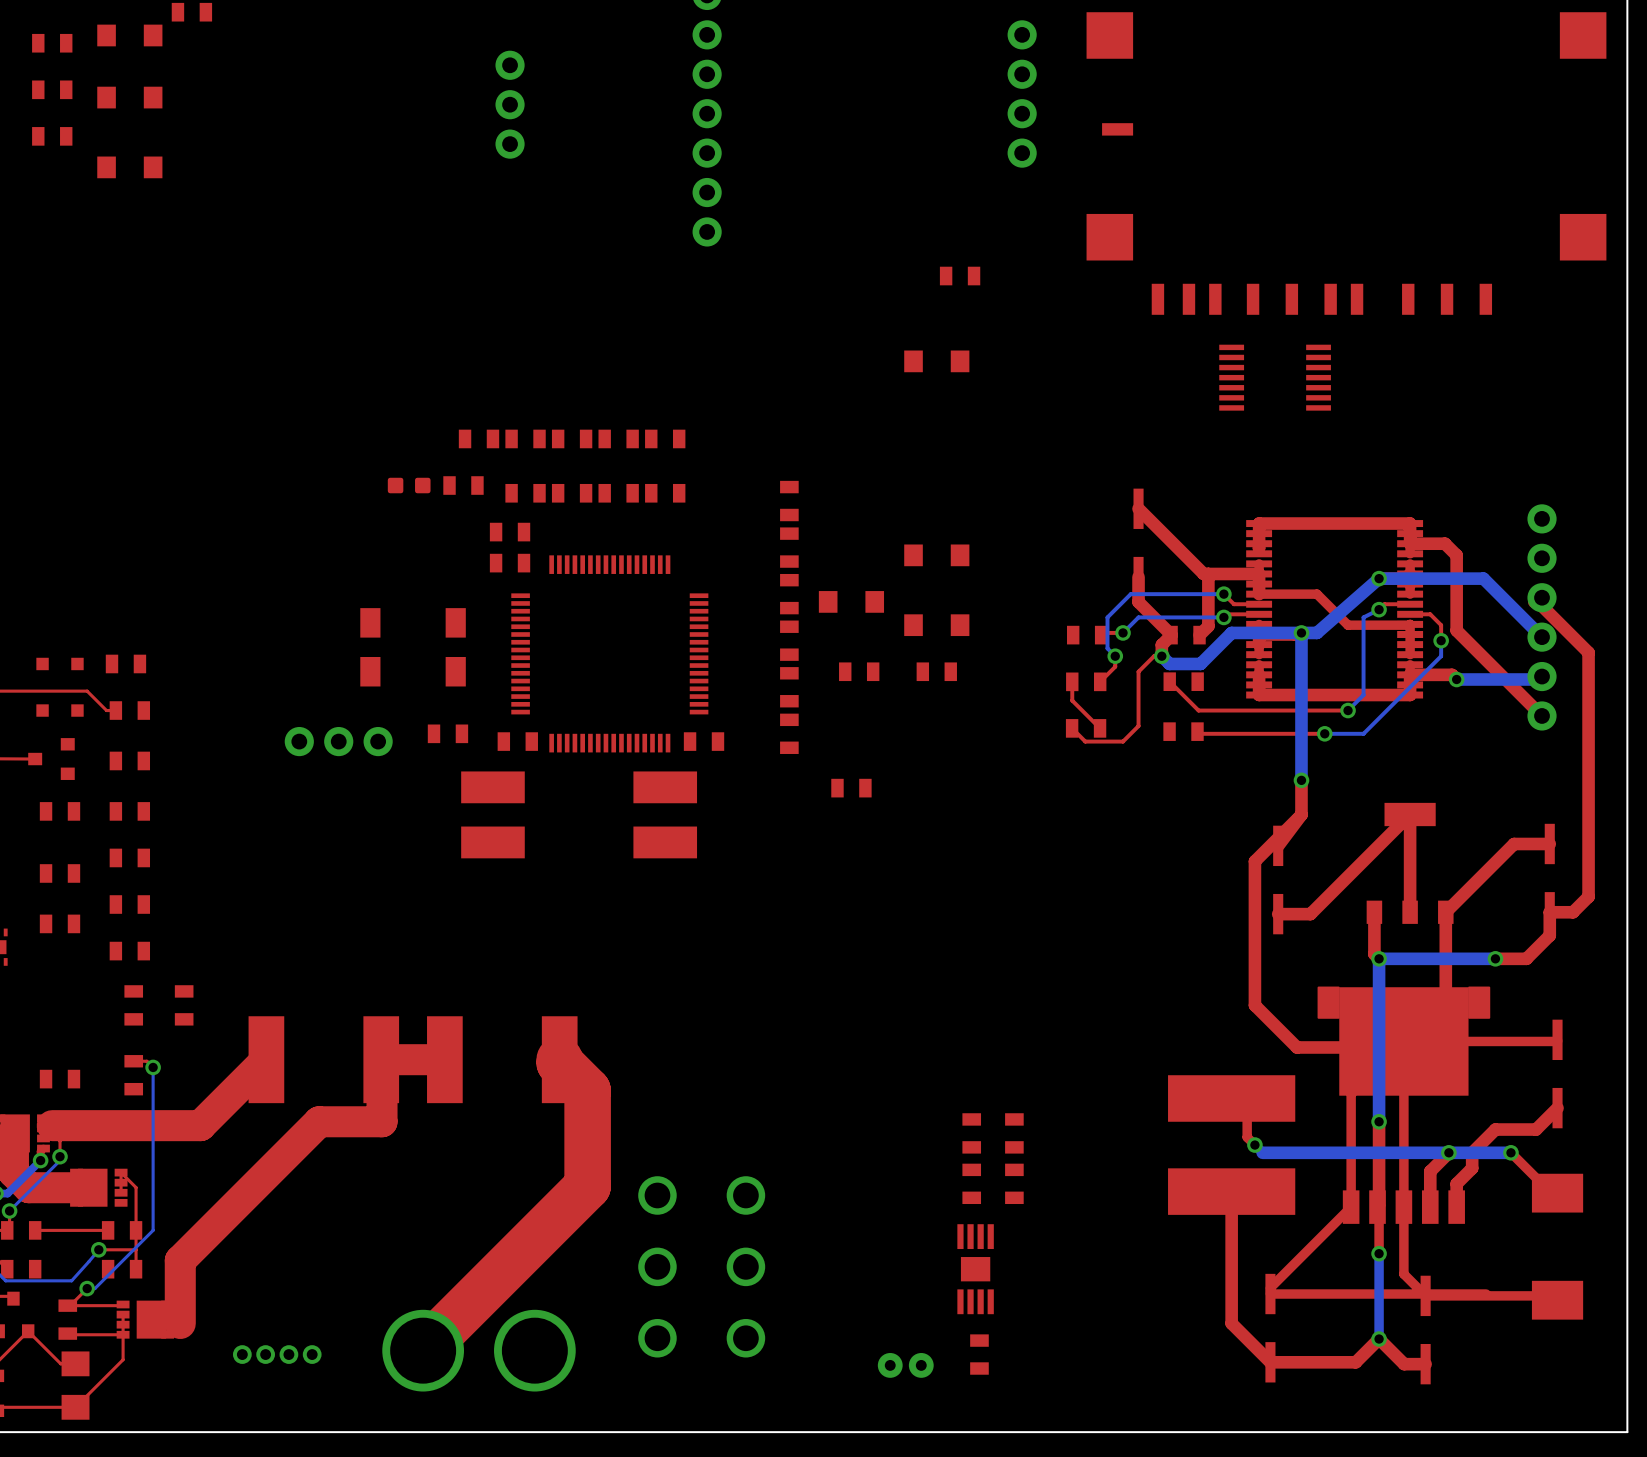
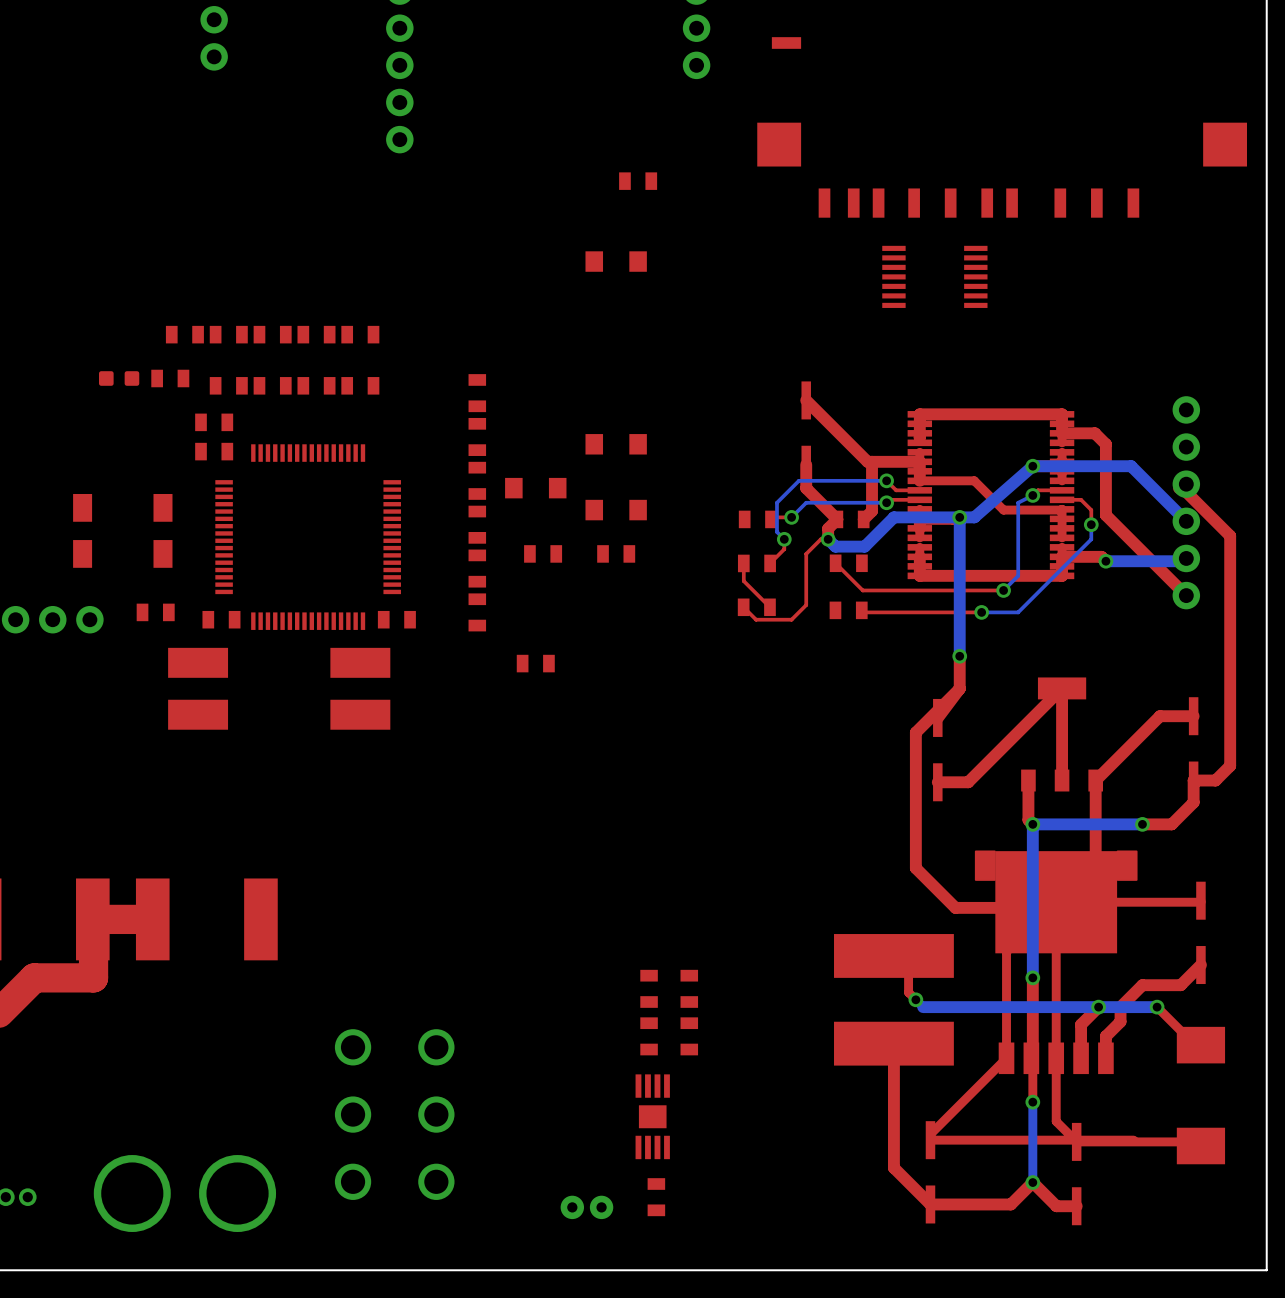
top track: (559, 1059) (559, 1062) (587, 1090) (587, 1186) (423, 1350) -> none

